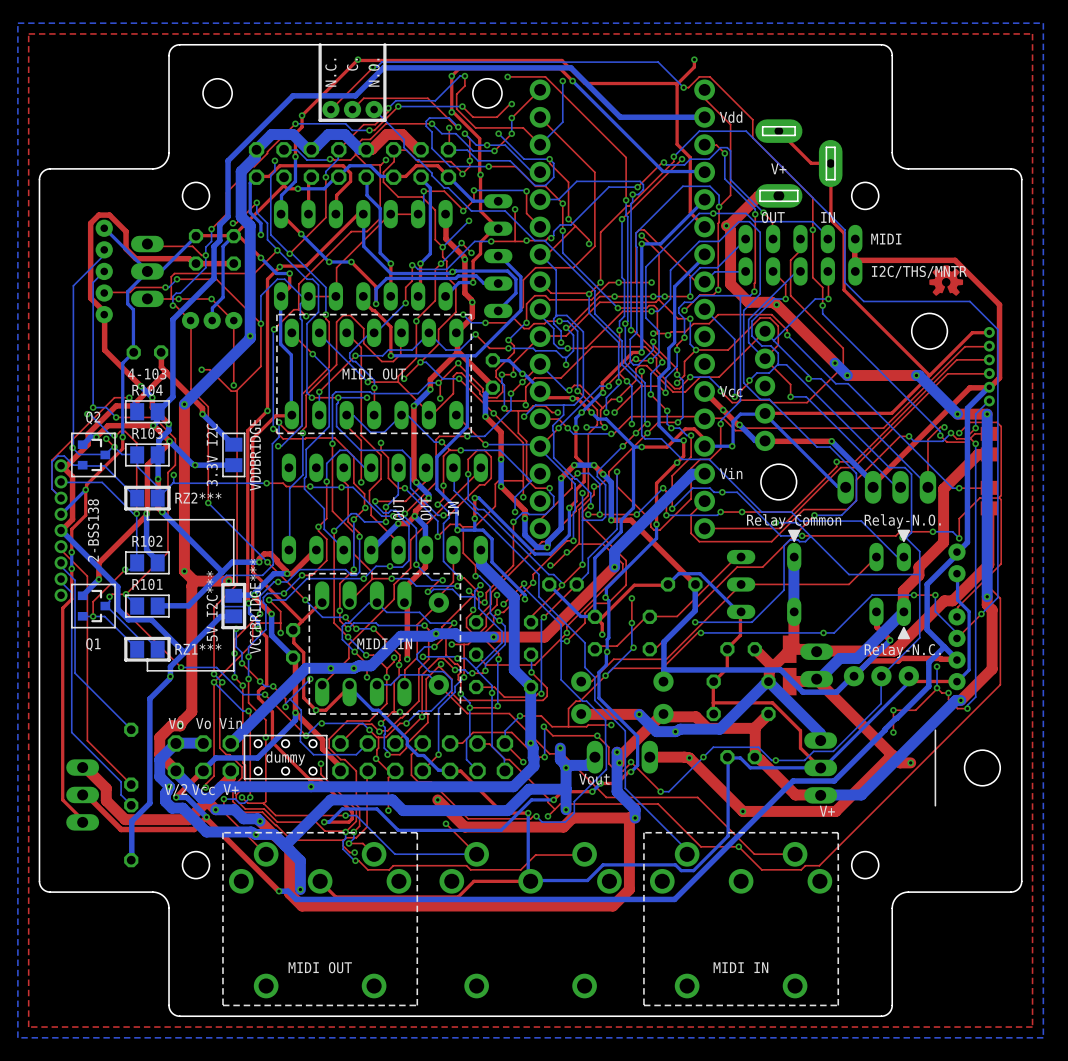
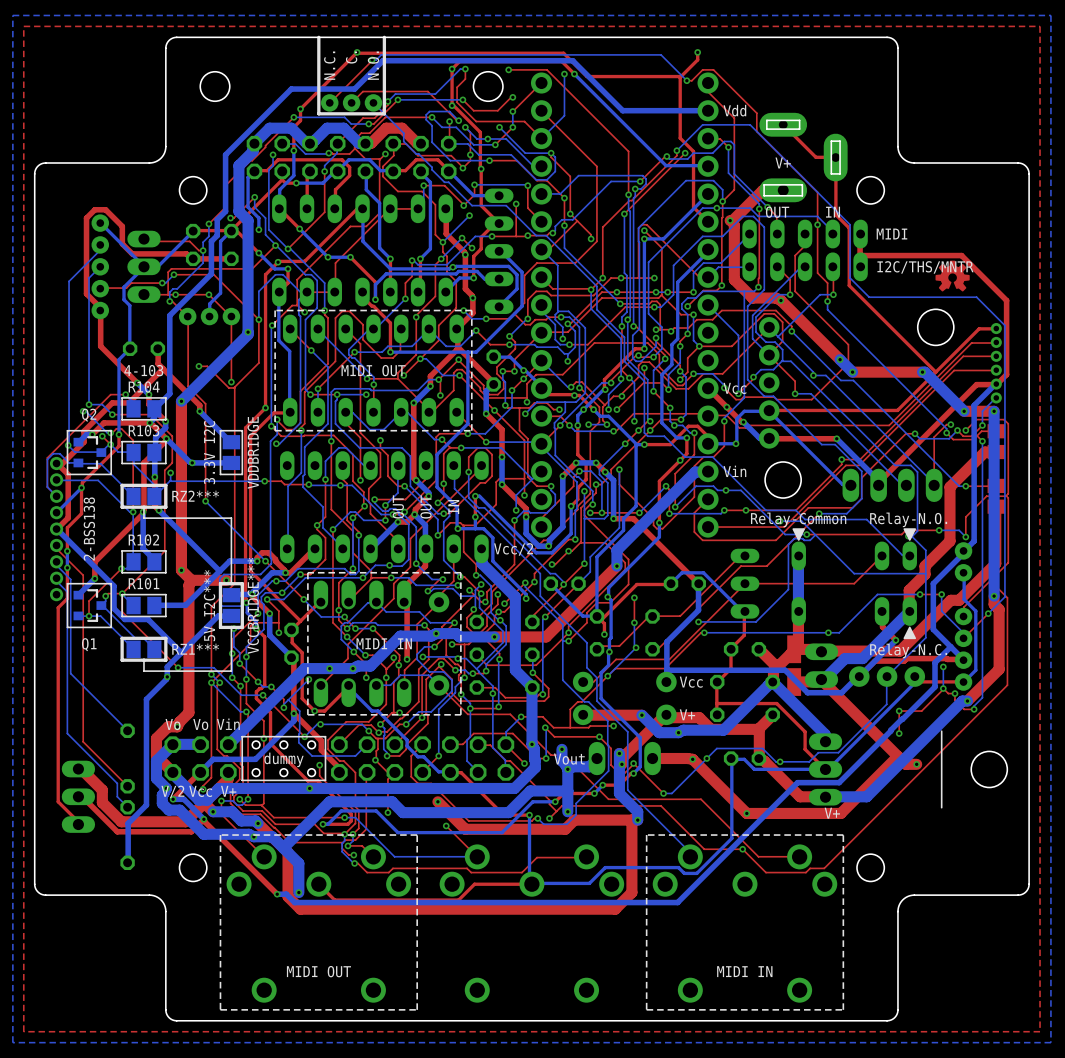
text: none -> Vcc/2 (513, 549)
text: none -> Vcc (691, 682)
text: none -> V+ (687, 714)
text position: Vout (594, 779) -> Vout (569, 759)

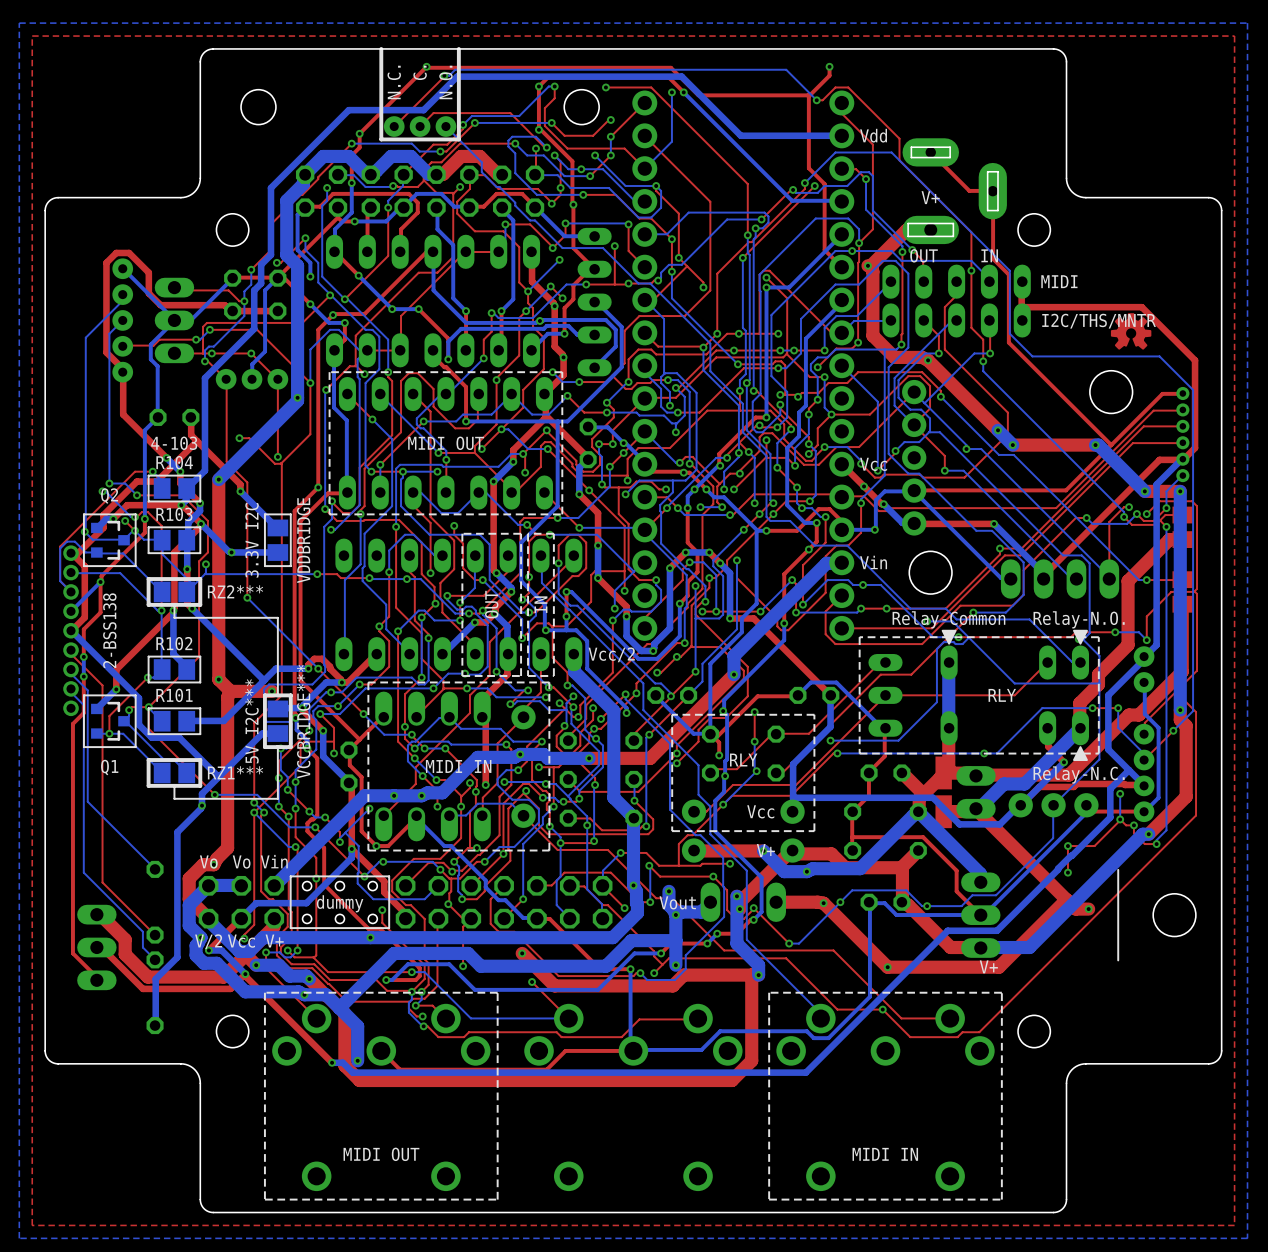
line: none -> (521, 533) (462, 533) (462, 675) (521, 675) (521, 533)
line: none -> (553, 533) (528, 533) (528, 675) (553, 675) (553, 533)
text: OUT (398, 506) -> none
text: none -> OUT (491, 604)
text: OUT (426, 506) -> none
line: none -> (1098, 637) (859, 637) (859, 753) (1098, 753) (1098, 637)
text: none -> RLY (1002, 695)
line: none -> (814, 714) (672, 714) (672, 831) (814, 831) (814, 714)
text: none -> RLY (743, 760)
text position: Vcc (691, 682) -> Vcc (760, 811)
text position: V+ (687, 714) -> V+ (765, 850)

